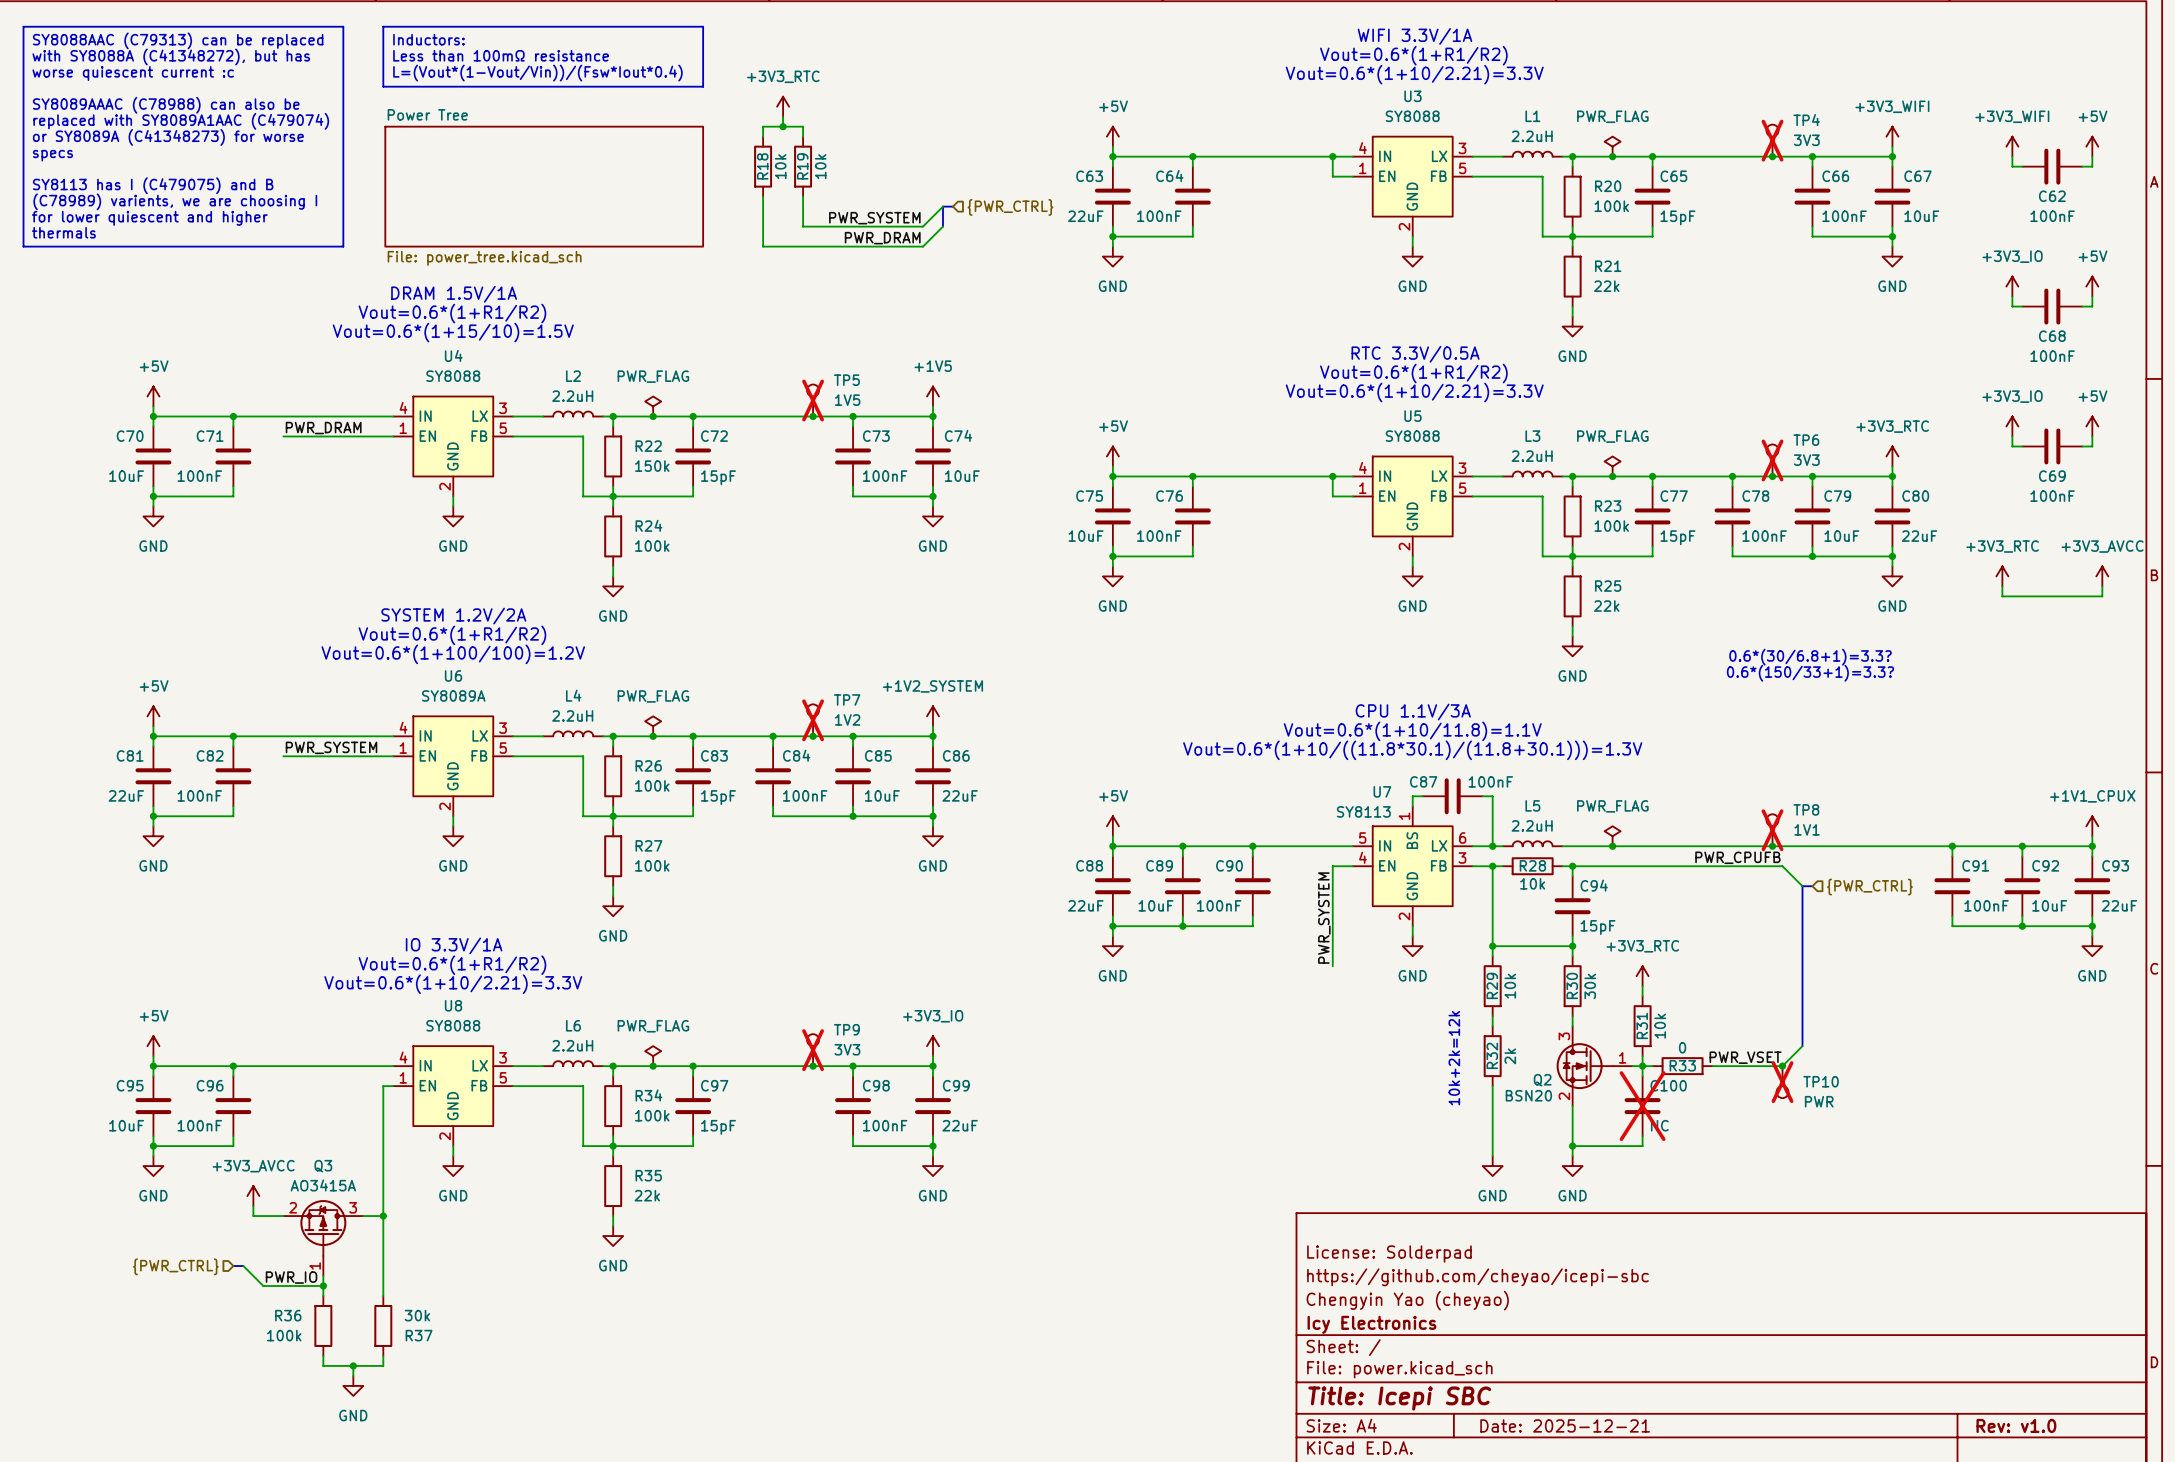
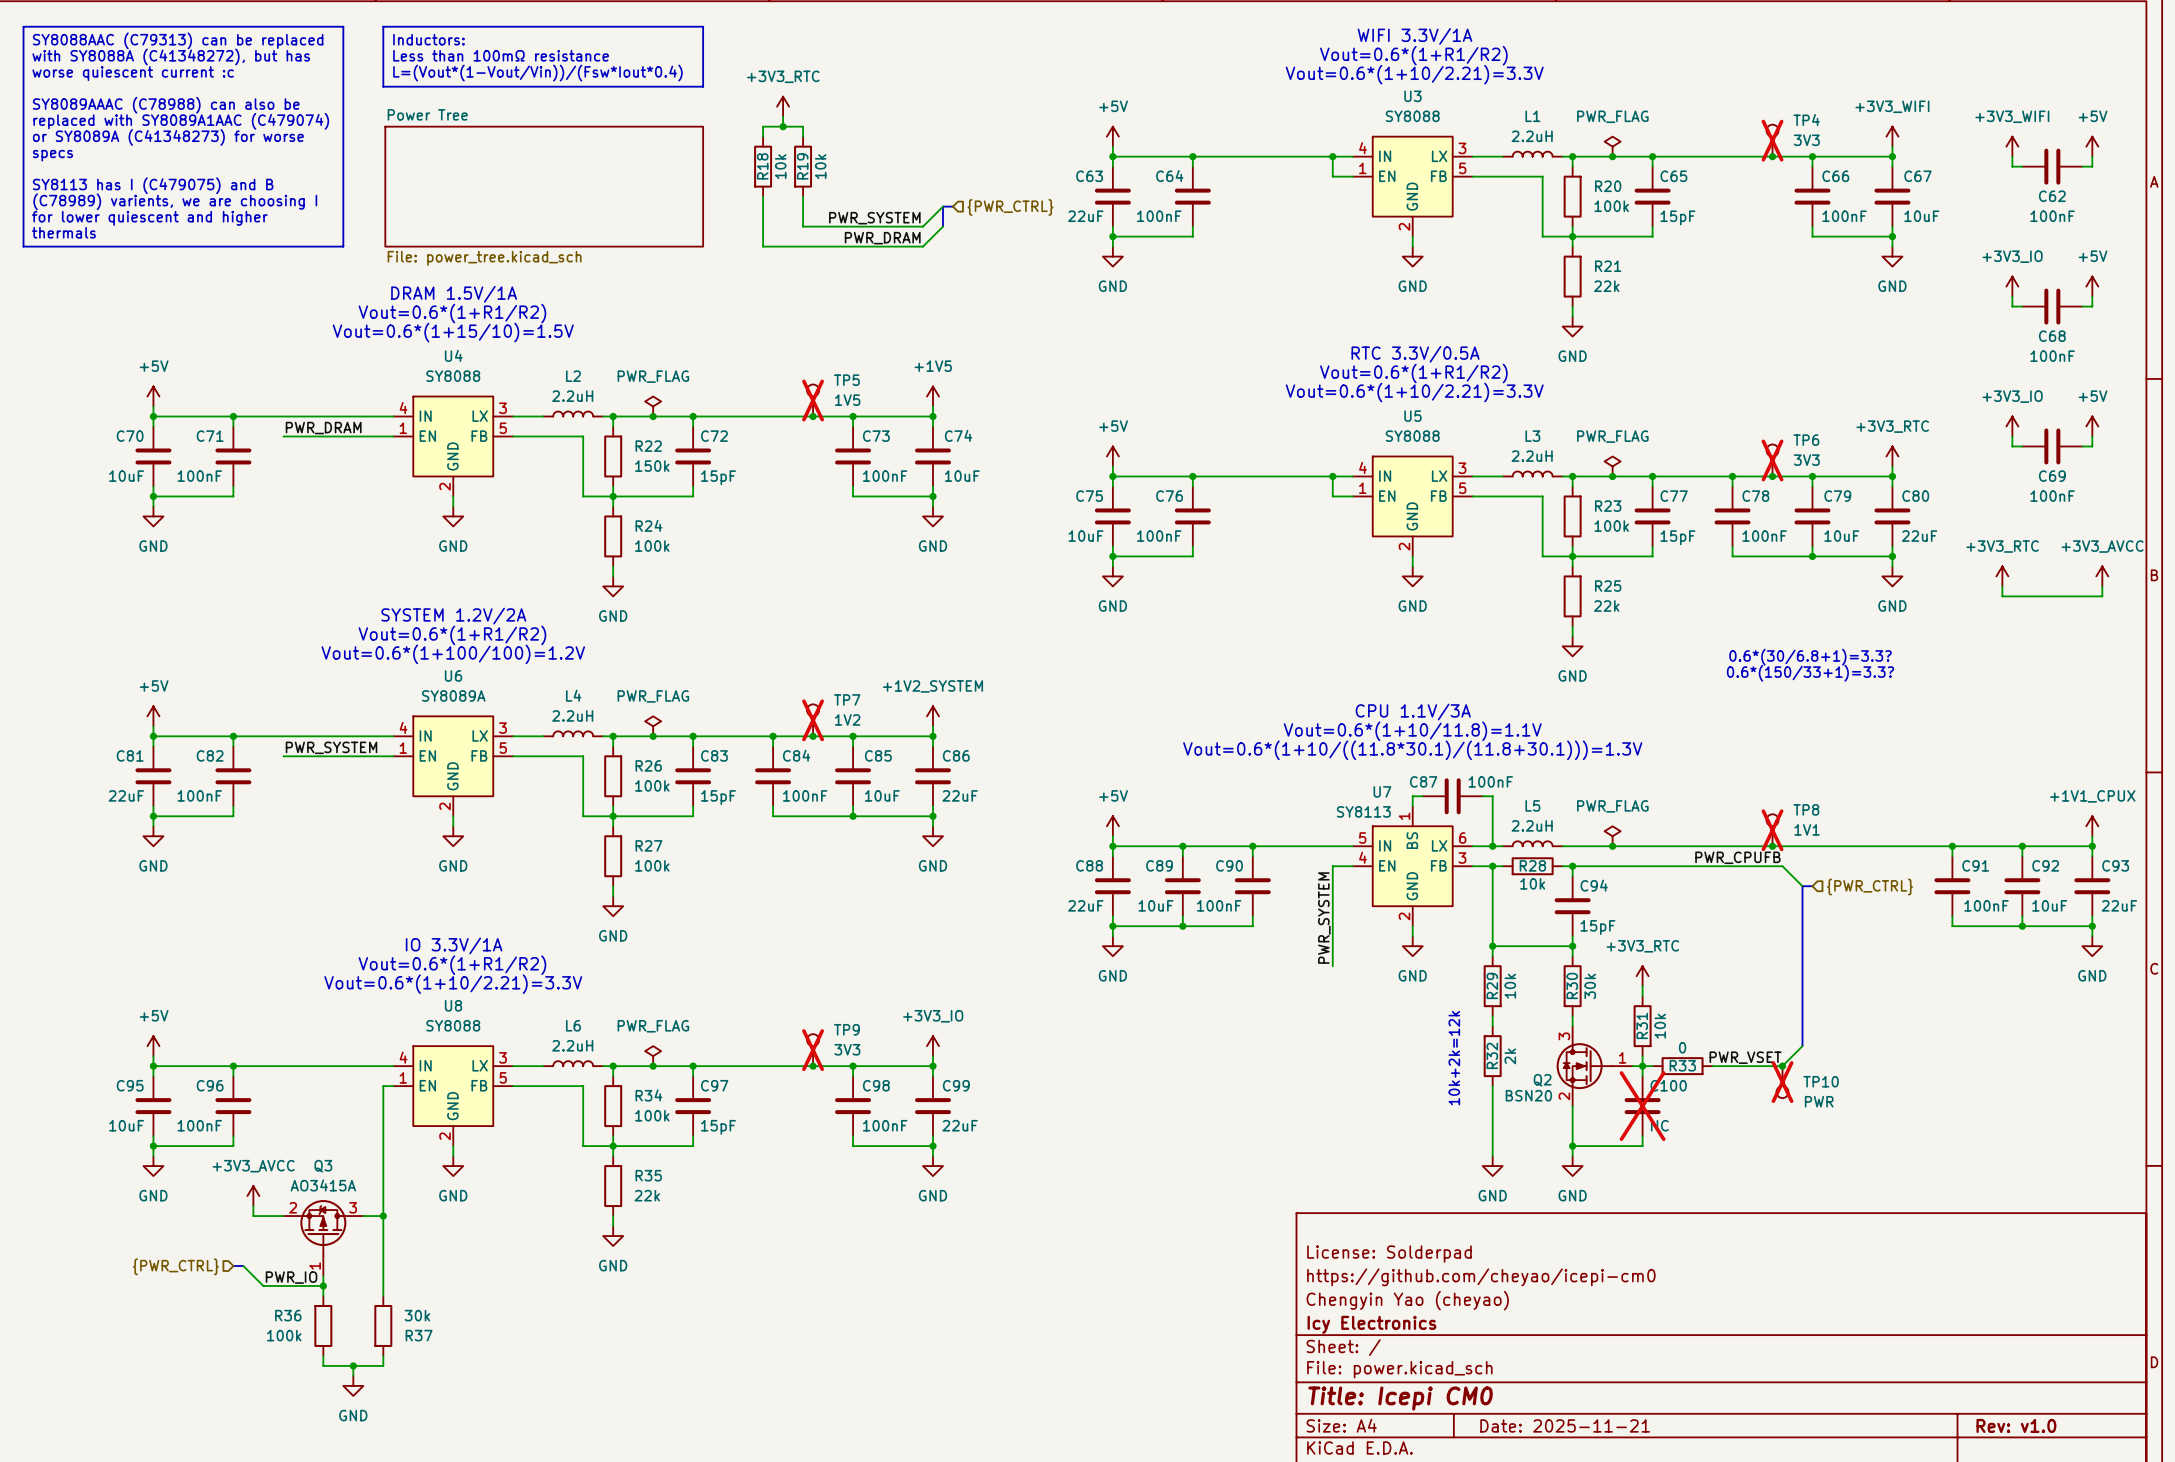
title block: https://github.com/cheyao/icepi-sbc (1477, 1277) -> https://github.com/cheyao/icepi-cm0 (1481, 1277)
title block: Title: Icepi SBC (1399, 1398) -> Title: Icepi CM0 (1400, 1398)
title block: Date: 2025-12-21 (1565, 1425) -> Date: 2025-11-21 (1565, 1425)

